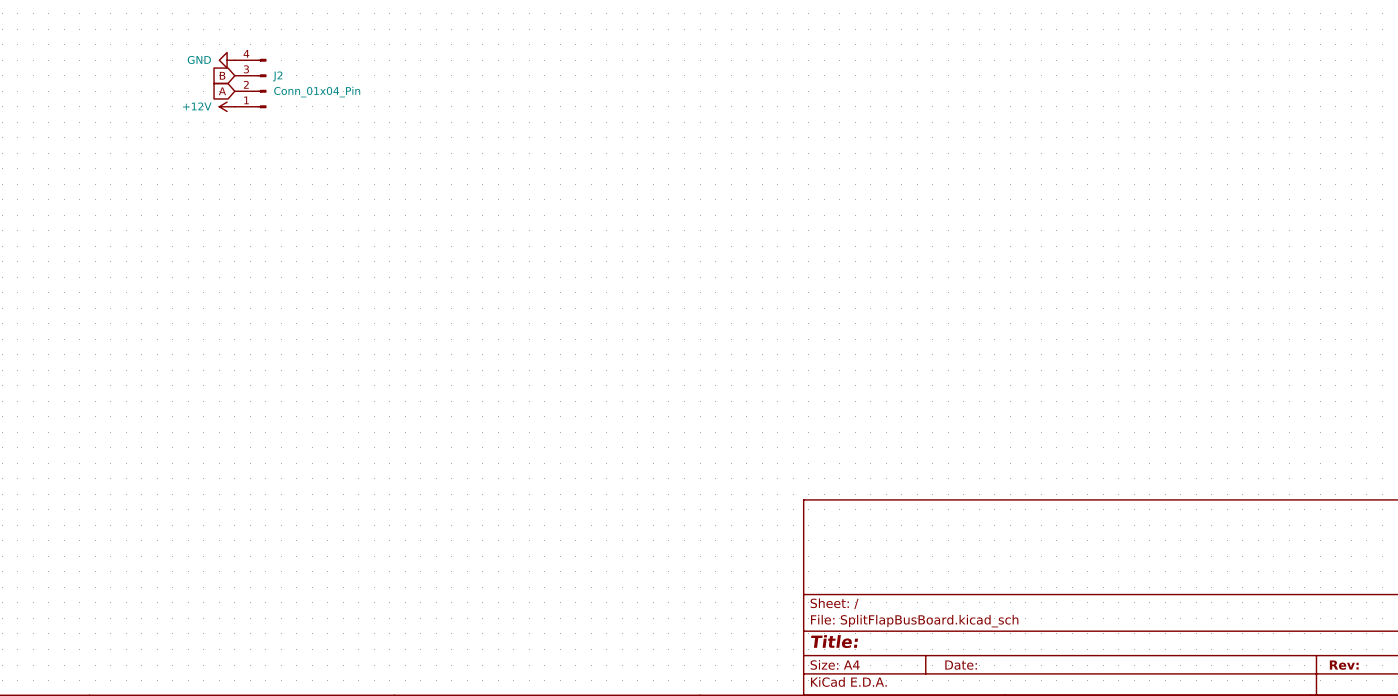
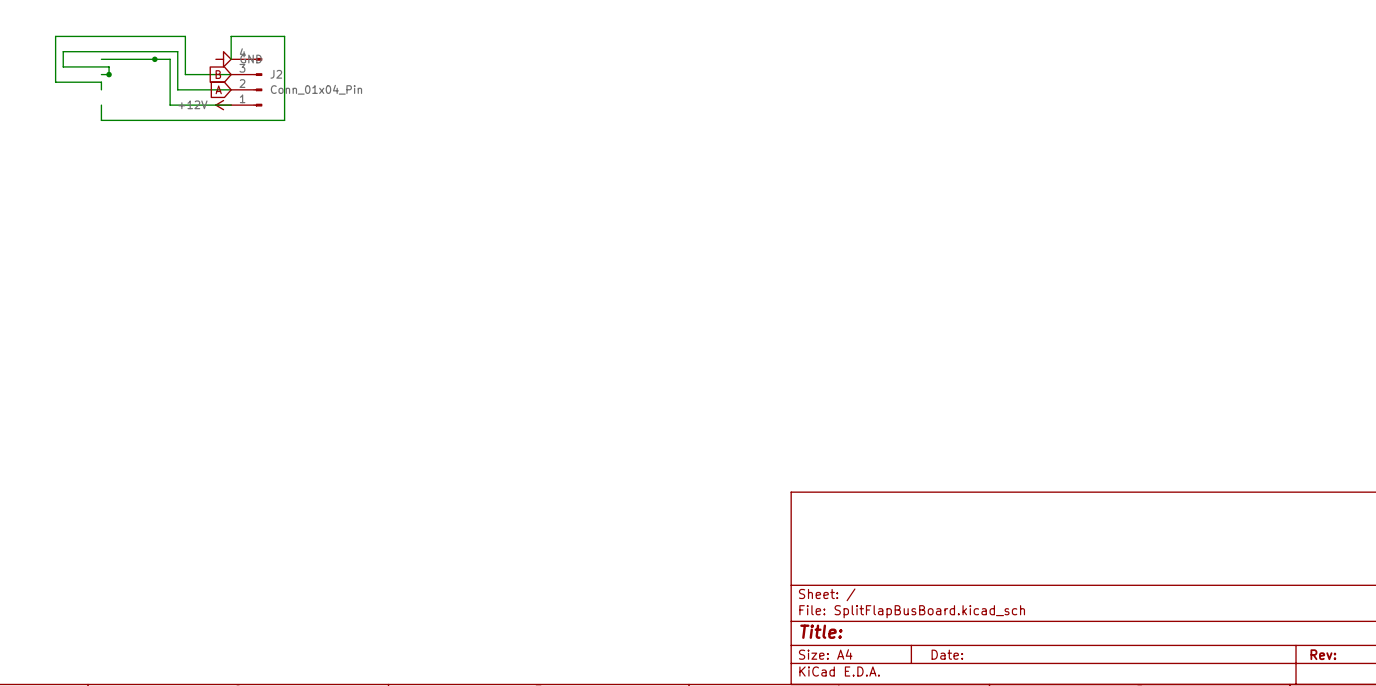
wire: none -> (101, 59) (170, 59) (170, 105) (231, 105)
junction: none -> (154, 59)
power symbol rotation: 0° (227, 60) -> 180° (223, 59)
wire: none -> (231, 59) (231, 36) (284, 36) (284, 120) (101, 120) (101, 105)
wire: none -> (101, 74) (109, 74) (109, 66) (63, 66) (63, 51) (177, 51) (177, 89) (231, 89)
junction: none -> (109, 74)
wire: none -> (231, 74) (185, 74) (185, 36) (55, 36) (55, 82) (101, 82) (101, 89)

